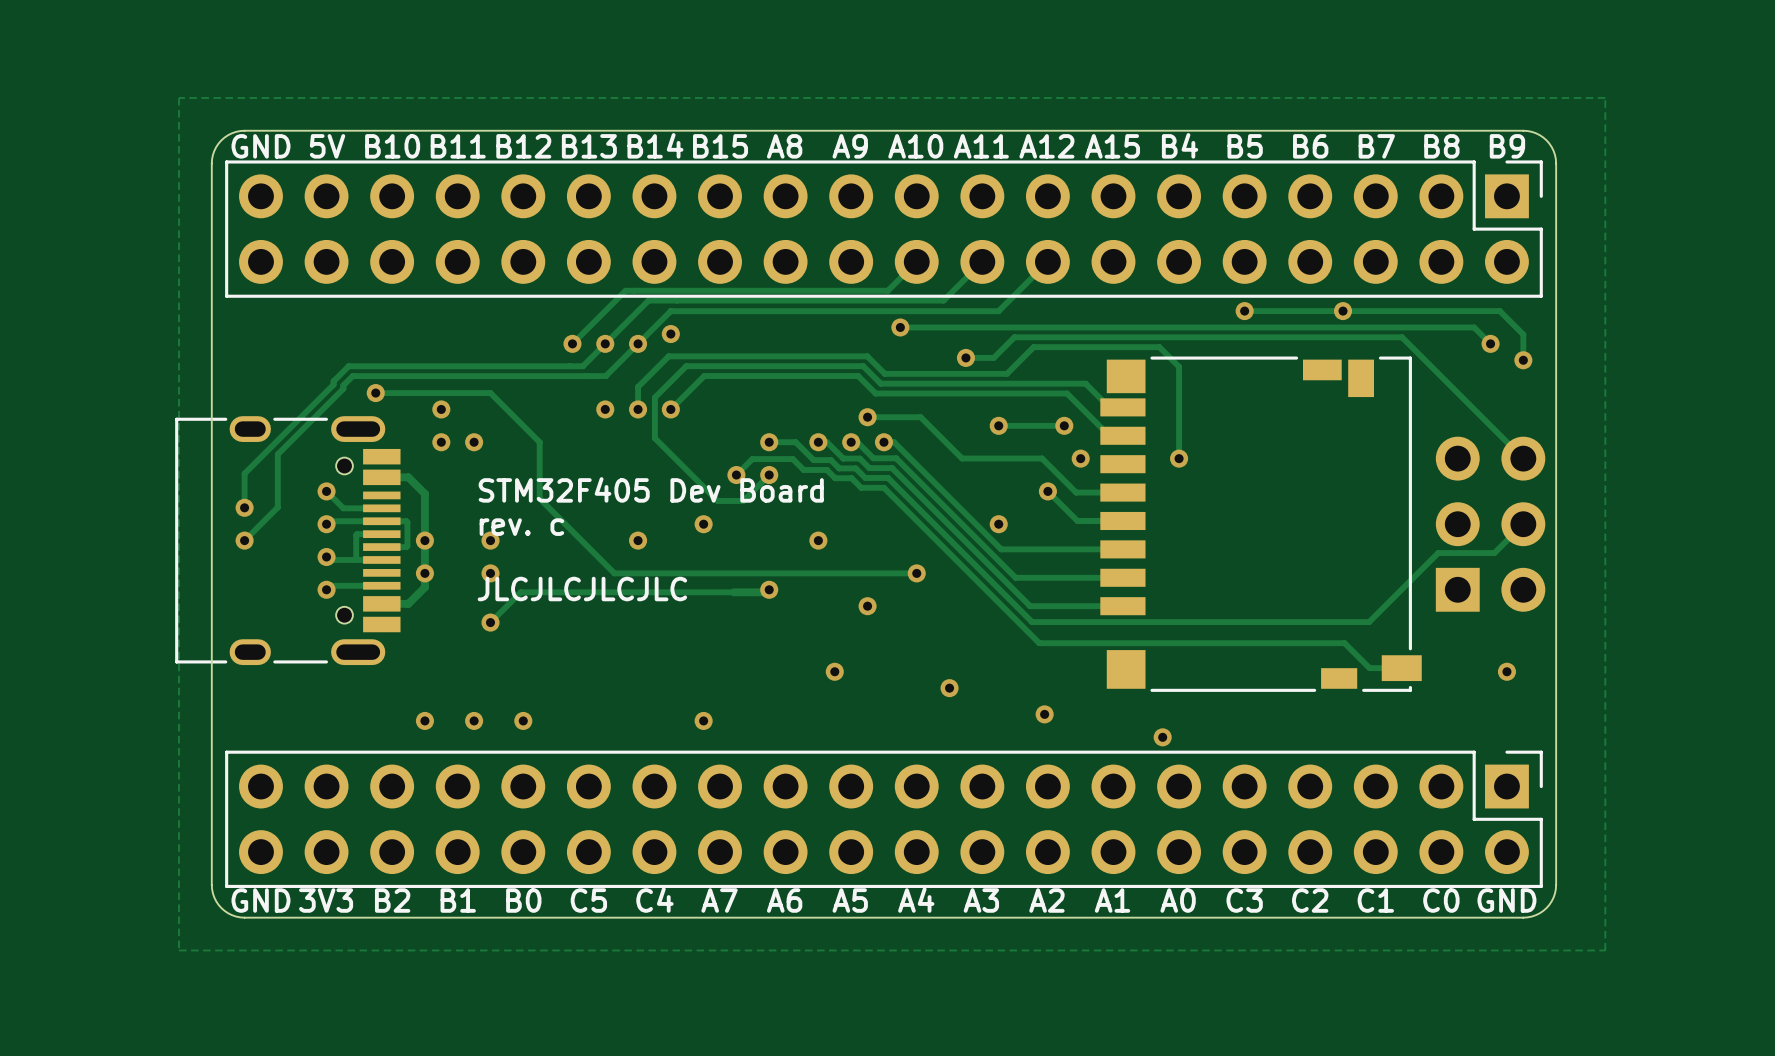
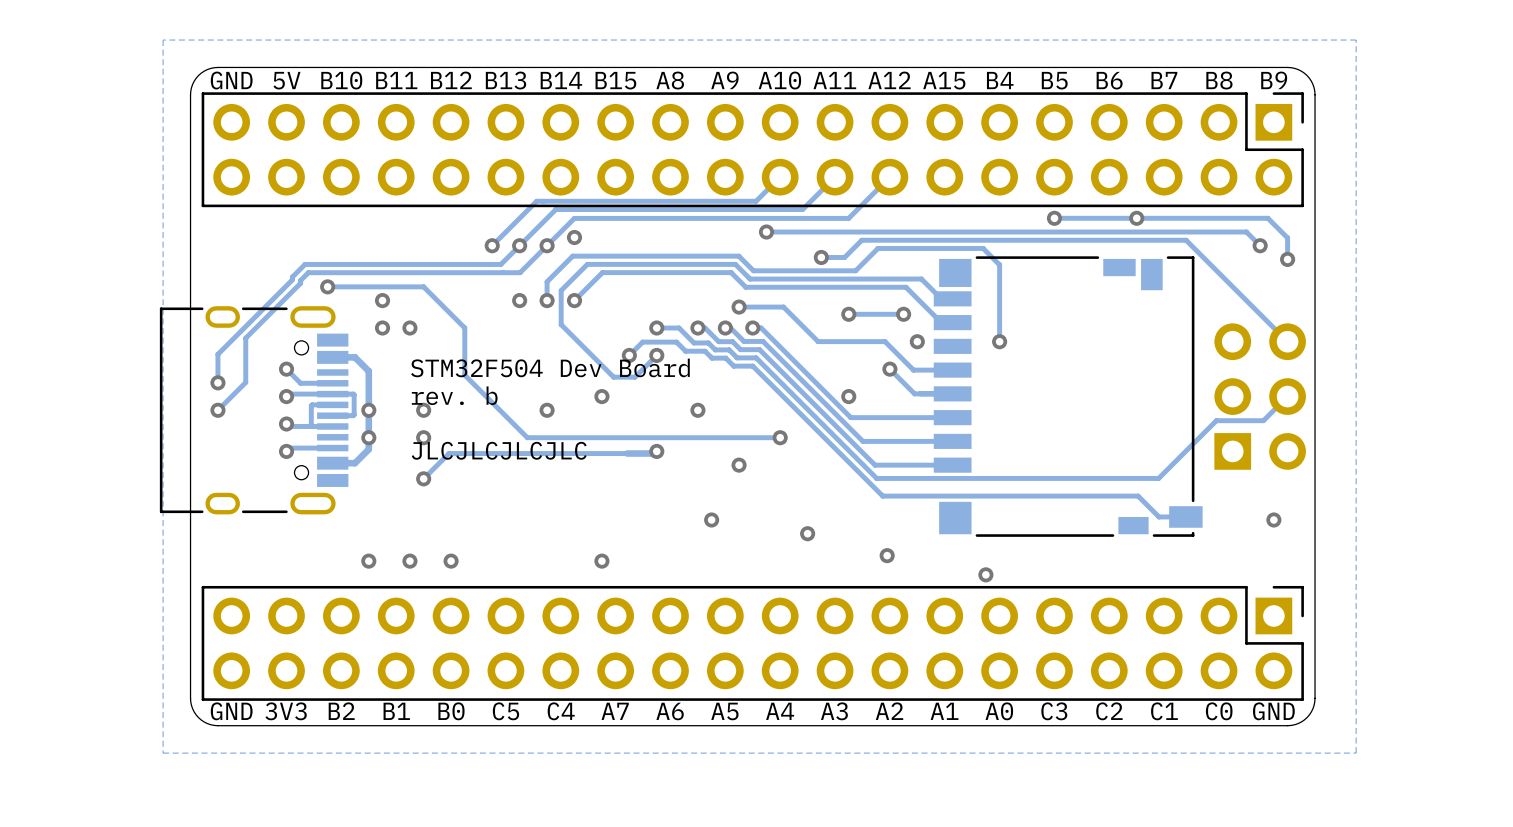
text: STM32F405 Dev Board (651, 489) -> STM32F504 Dev Board (550, 367)
text: rev. c (521, 527) -> rev. b (454, 395)

